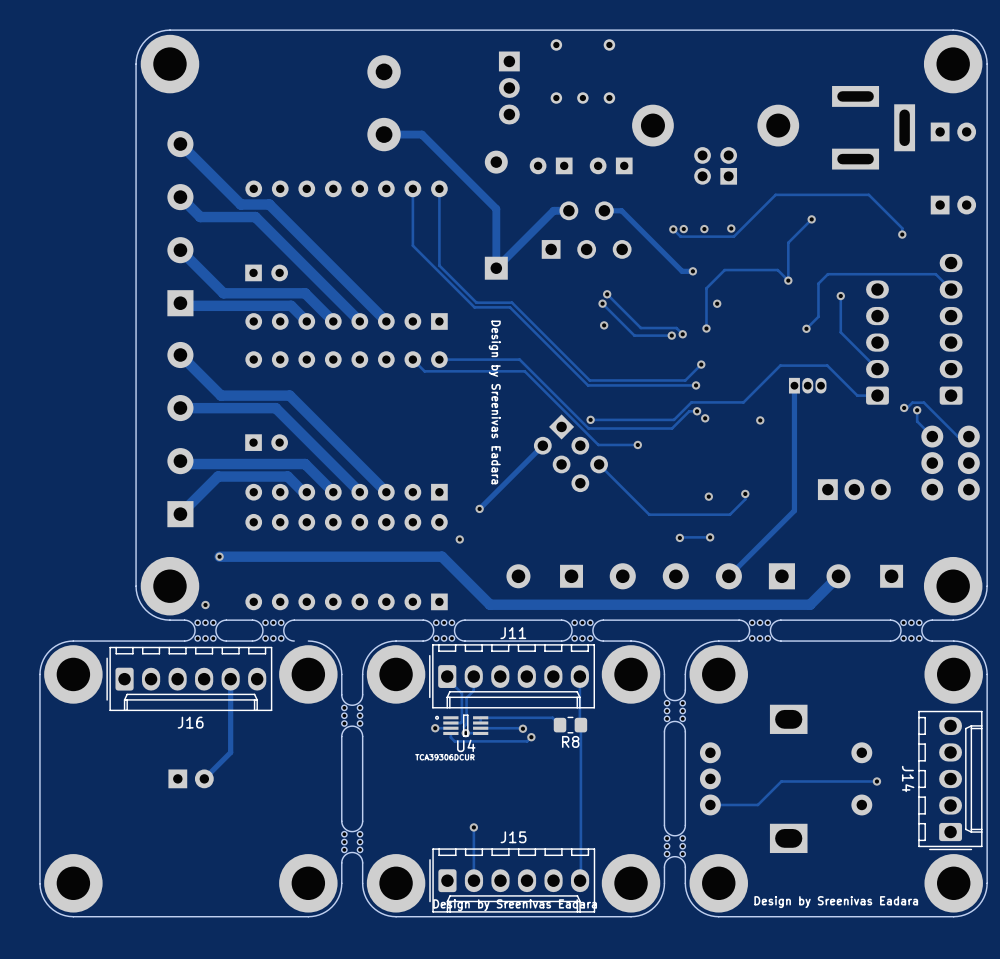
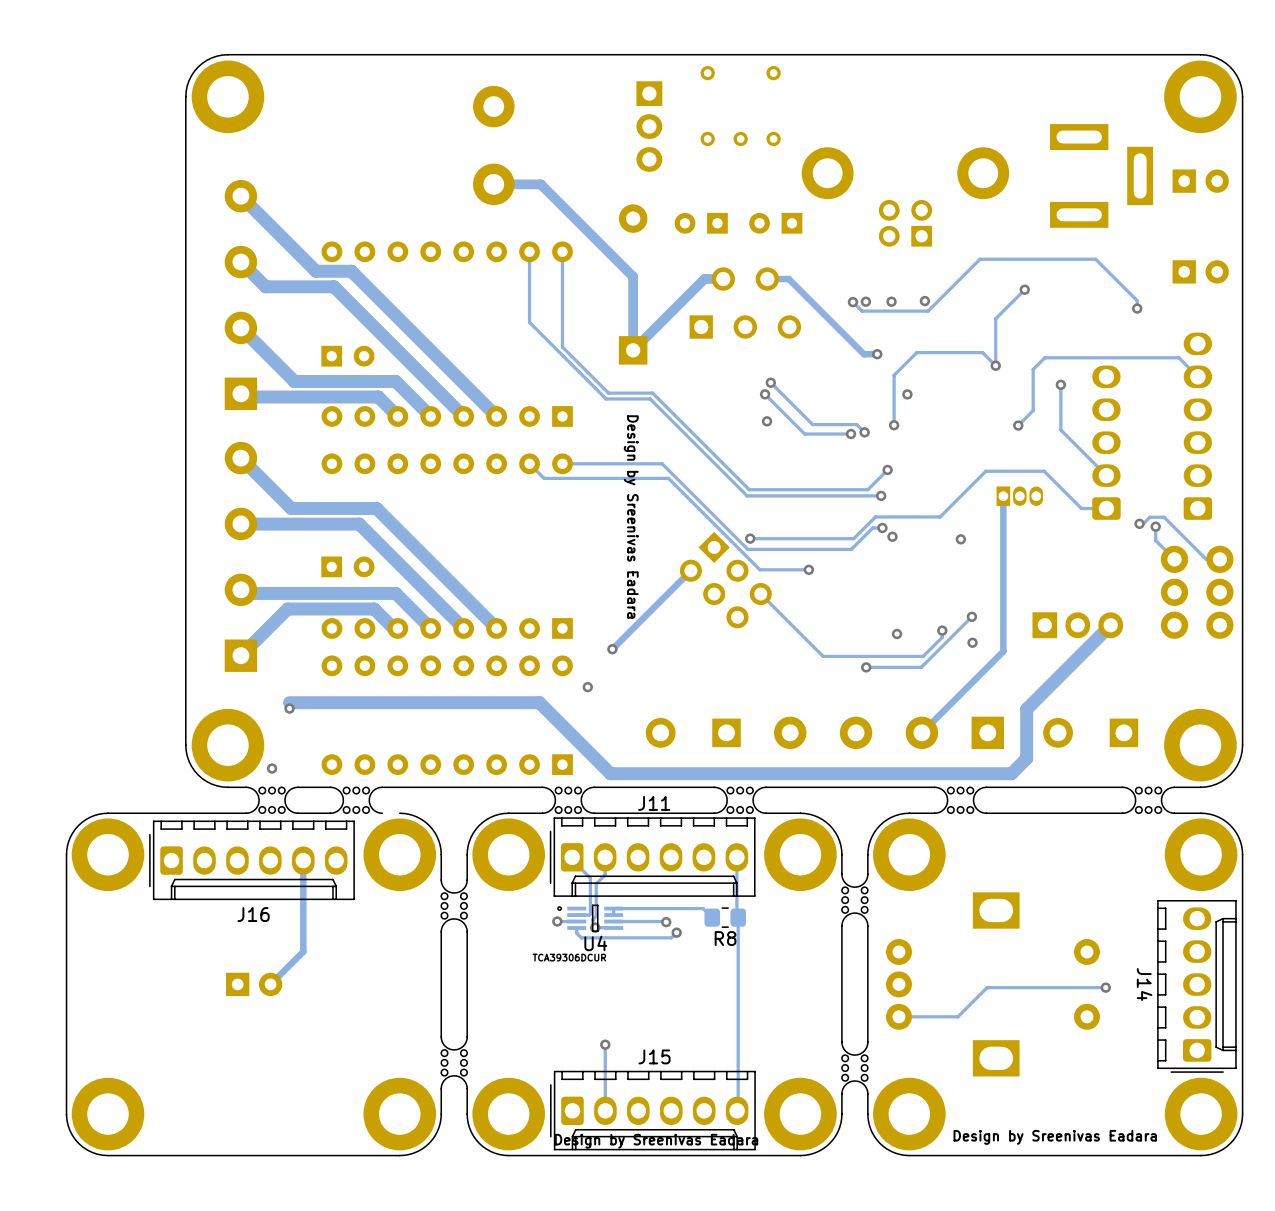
track: none -> (971, 616) (921, 667) (866, 667)
via: none -> (971, 616)
track: none -> (1110, 625) (1026, 709) (1026, 758) (1011, 773) (610, 773) (539, 702) (289, 702)
via: none -> (972, 642)
via: none -> (866, 667)
via: (679, 537) -> none
track: (710, 537) (679, 537) -> none
via: (710, 537) -> none
track: (219, 556) (442, 556) (490, 604) (810, 604) (838, 576) -> none

